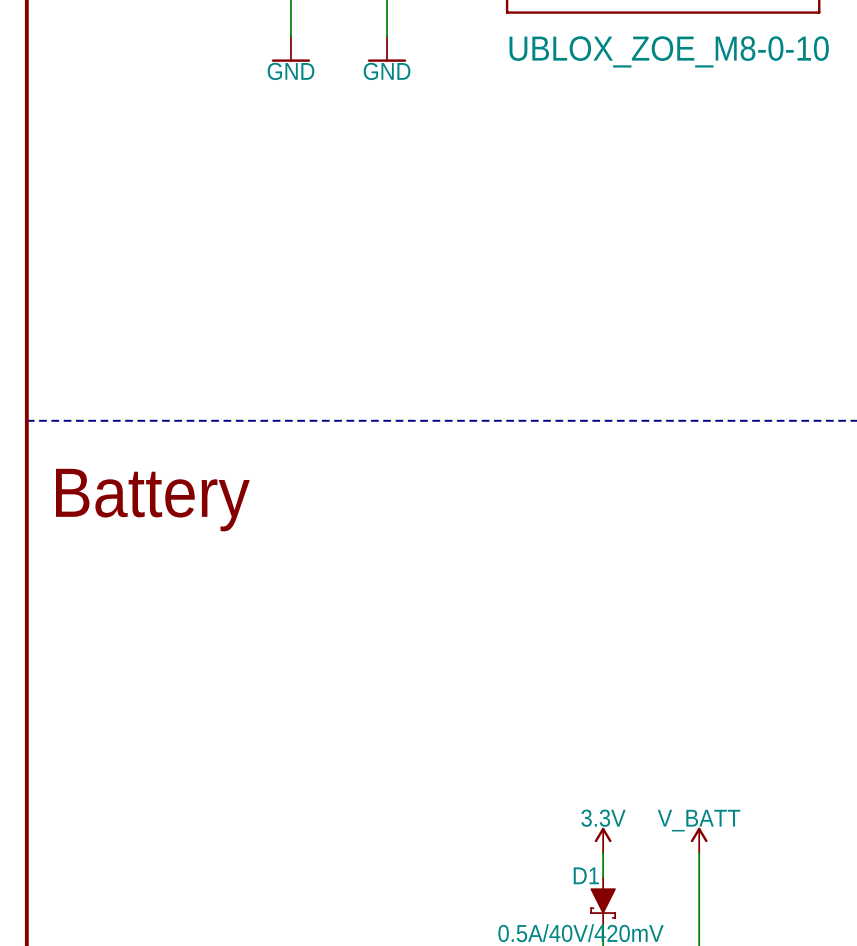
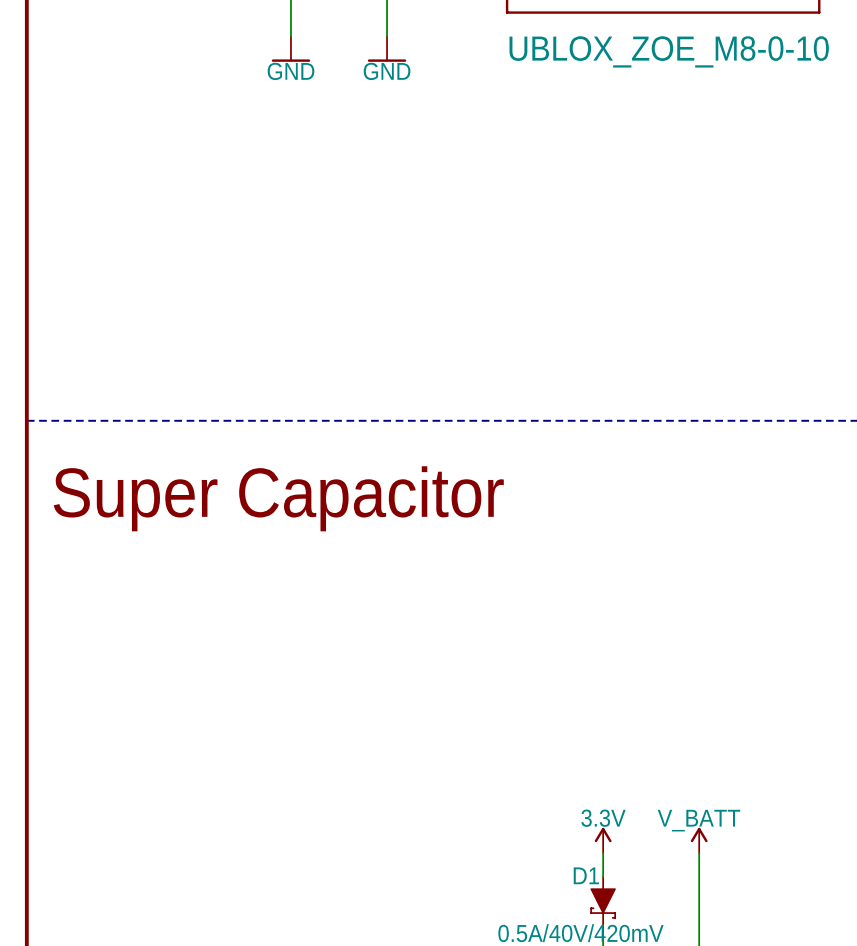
text: Battery (152, 500) -> Super Capacitor (278, 498)

